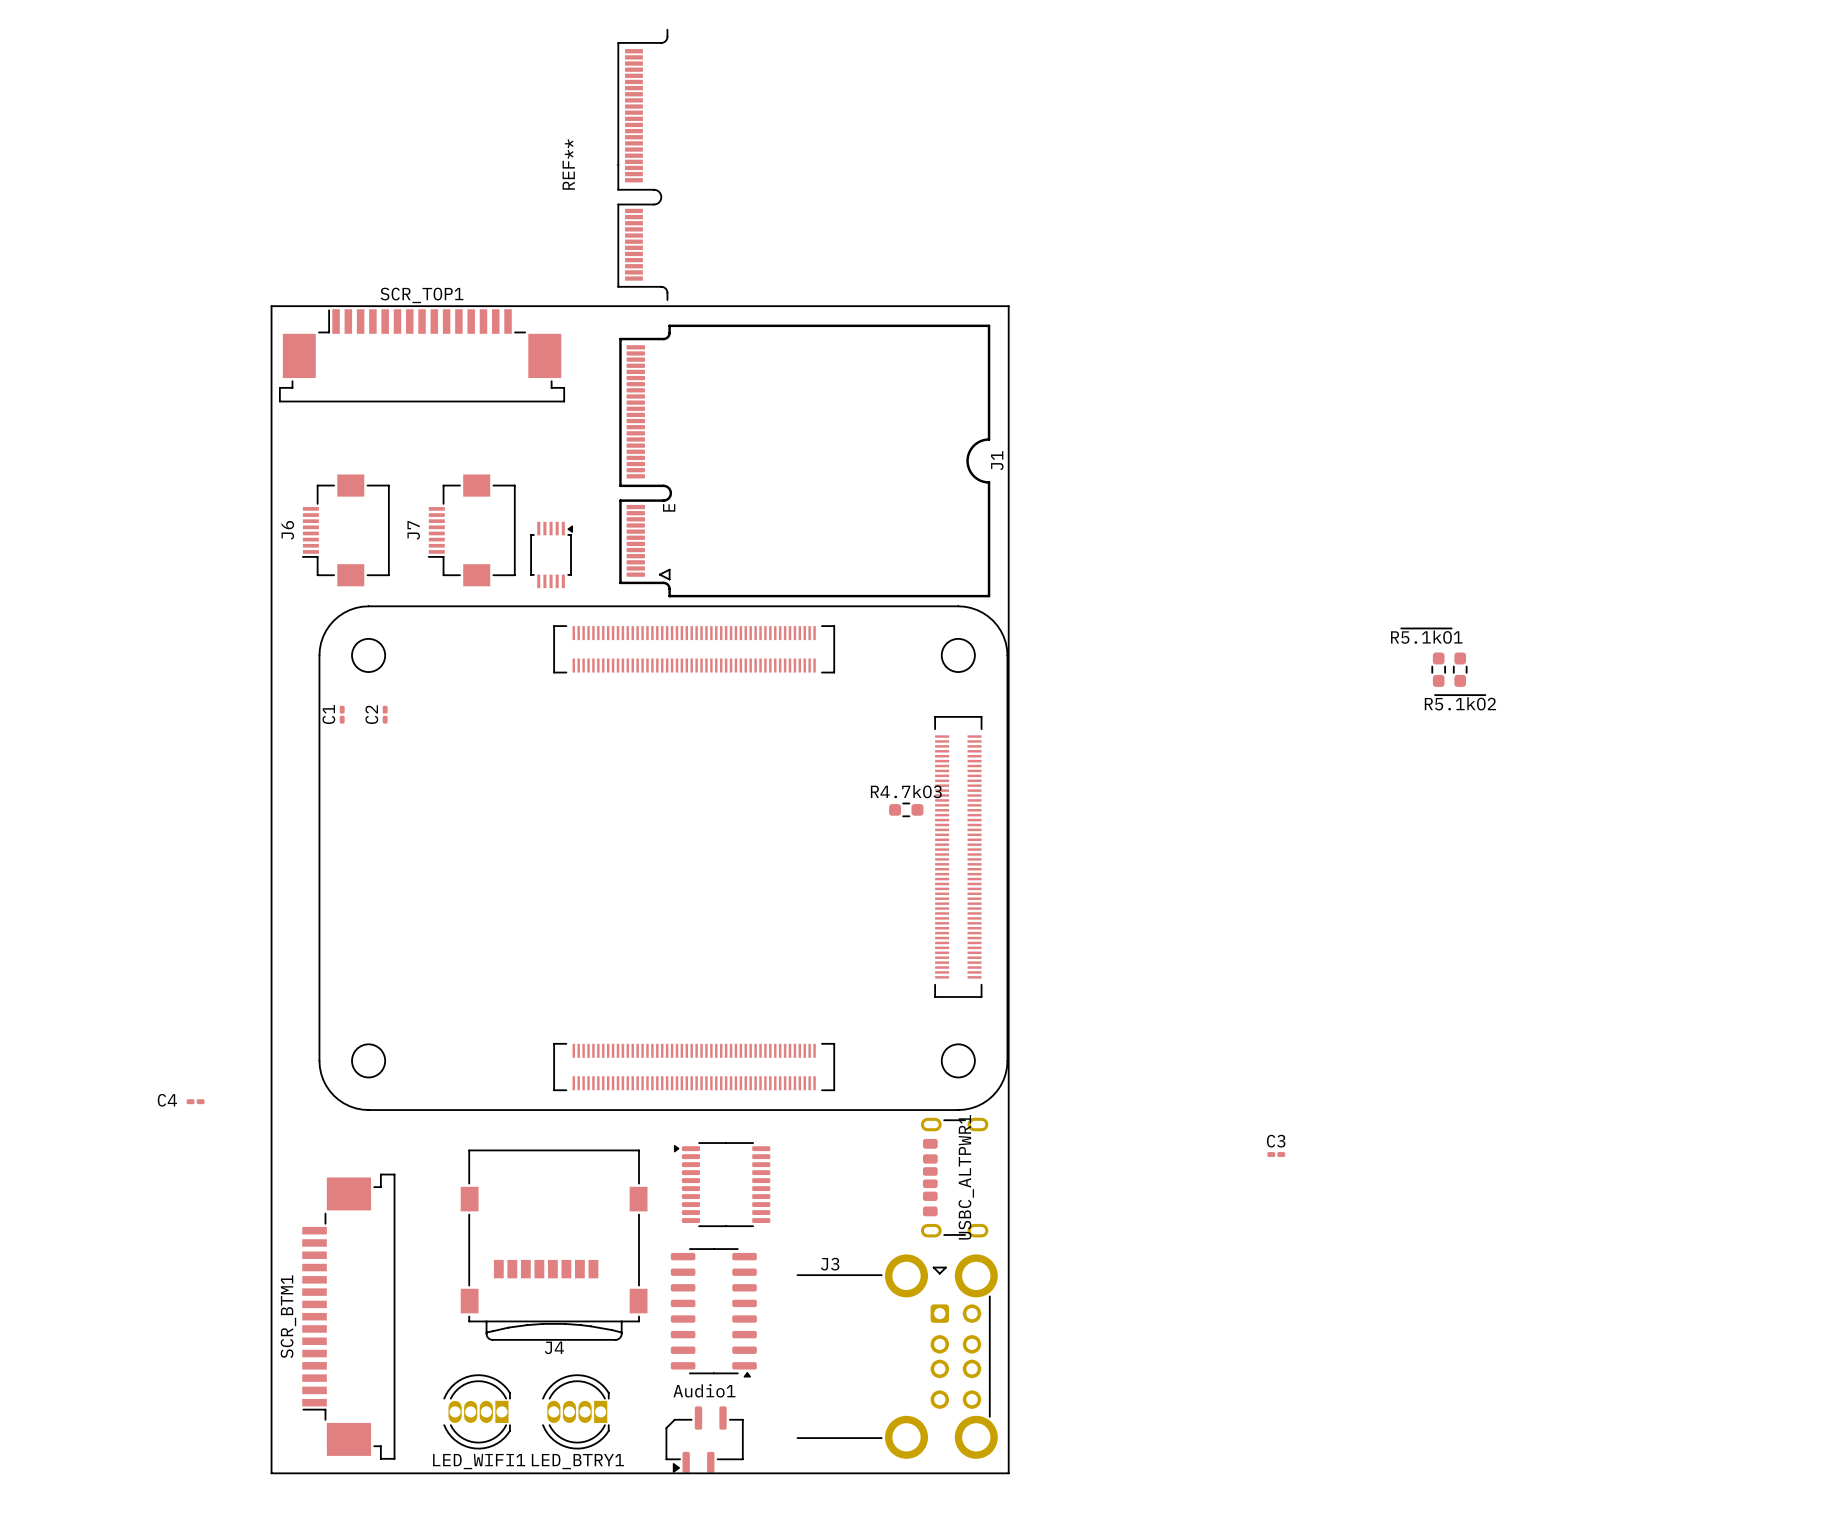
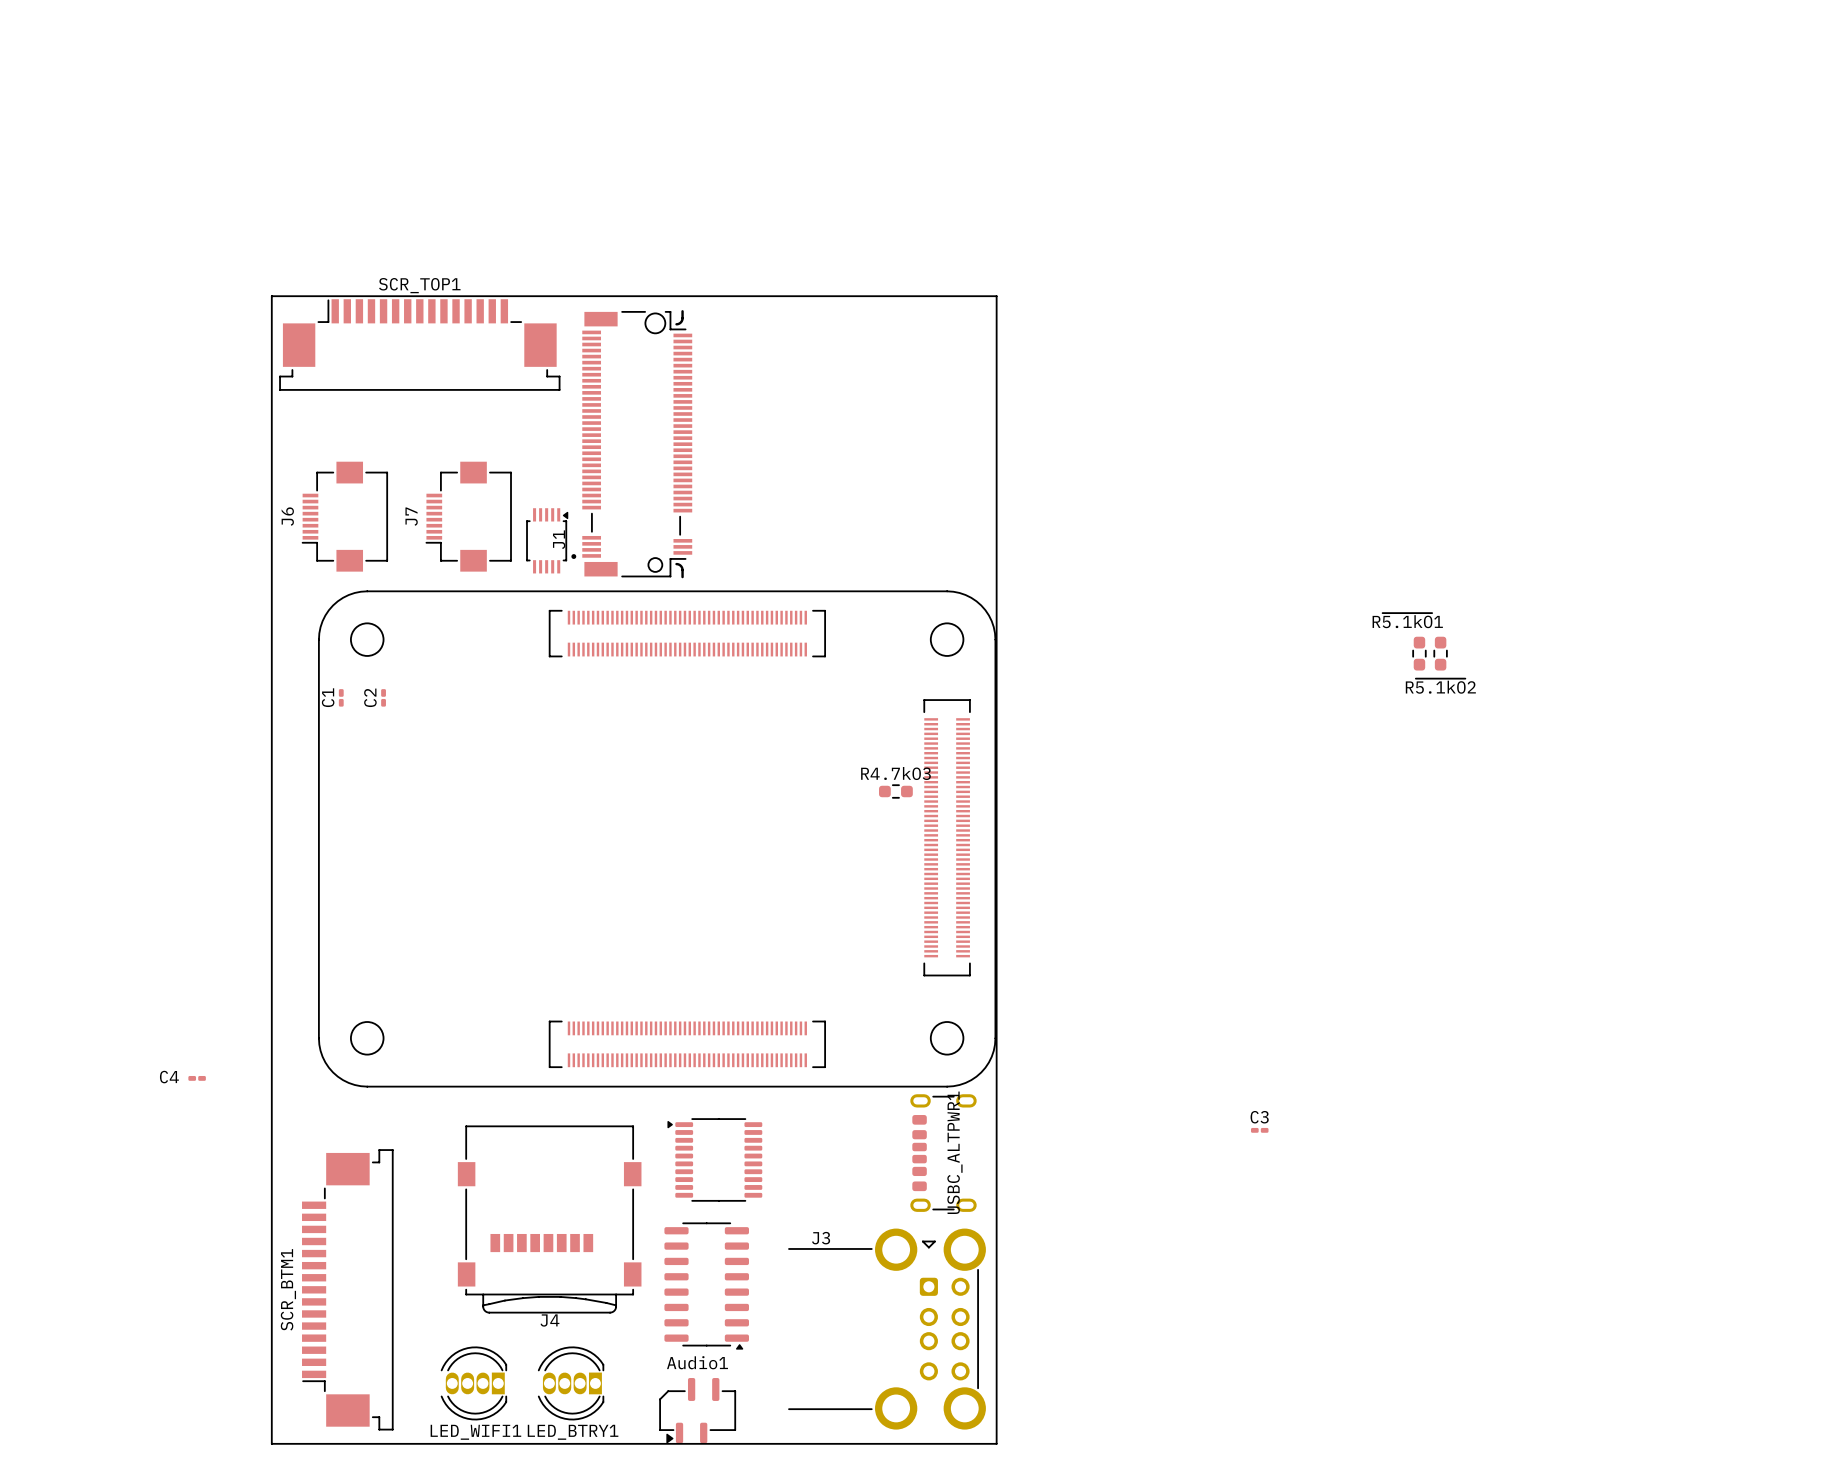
REF**: (642, 164) -> none
drawing: none -> [675, 310, 684, 579]
J1 footprint: [619, 324, 991, 598] -> [571, 311, 693, 578]
J1 name position: J1 (997, 460) -> J1 (559, 539)

